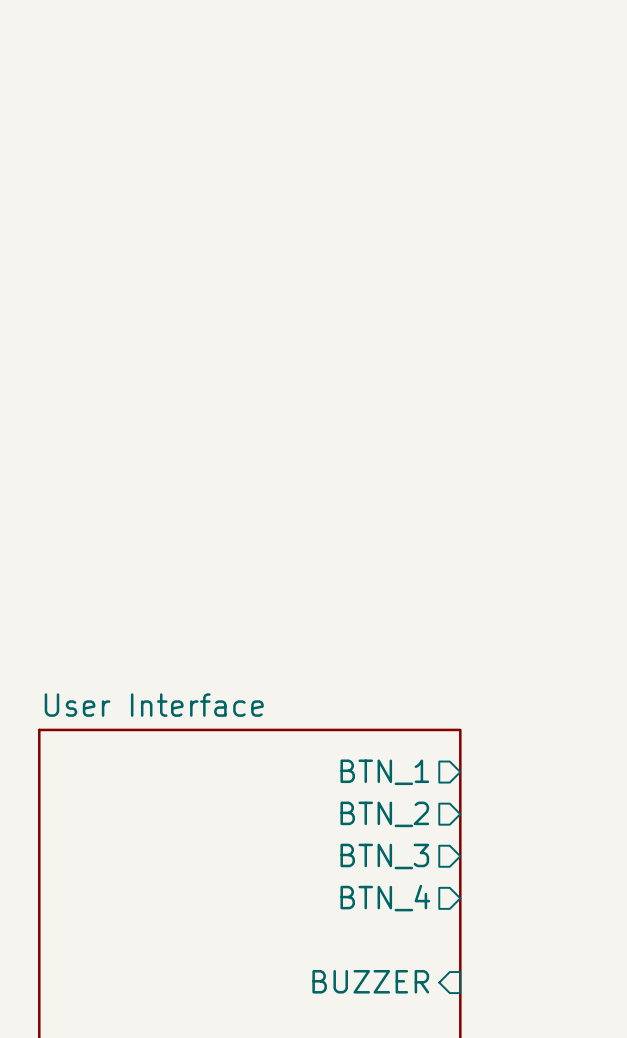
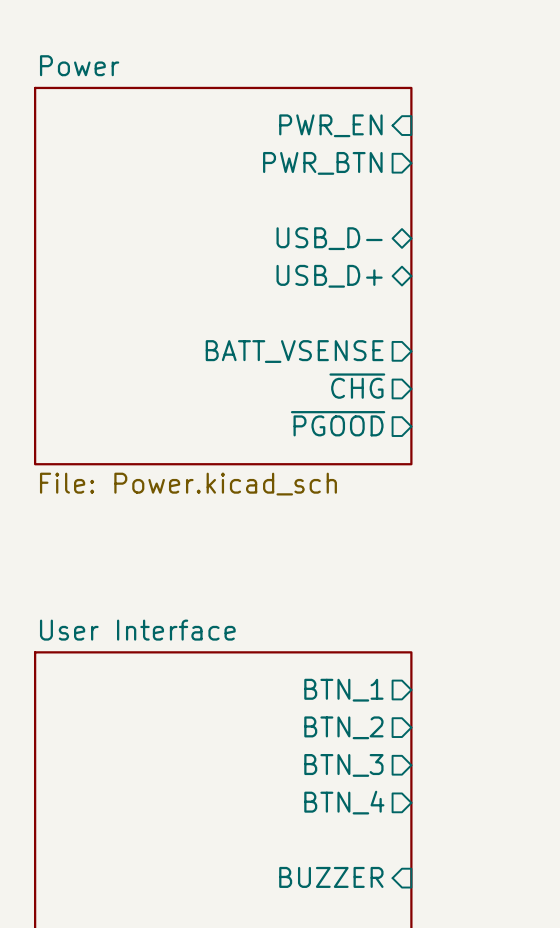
sheet pin: none -> PWR_EN (330, 125)
sheet pin: none -> PWR_BTN (322, 163)
sheet pin: none -> USB_D- (329, 238)
sheet Power: none -> File: Power.kicad_sch (223, 276)
sheet pin: none -> USB_D+ (329, 276)
sheet pin: none -> BATT_VSENSE (294, 351)
sheet pin: none -> ~{CHG} (357, 386)
sheet pin: none -> ~{PGOOD} (338, 423)

